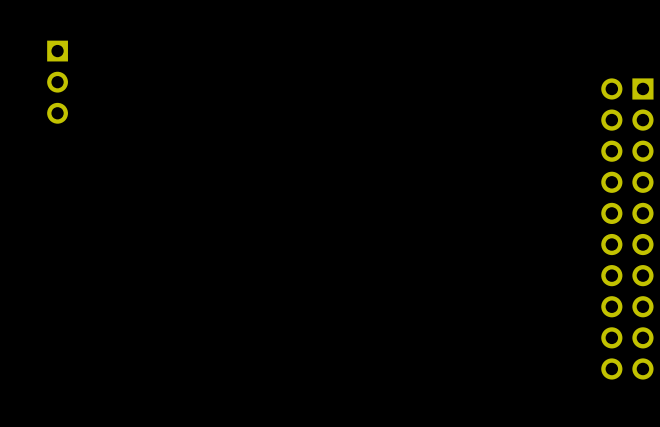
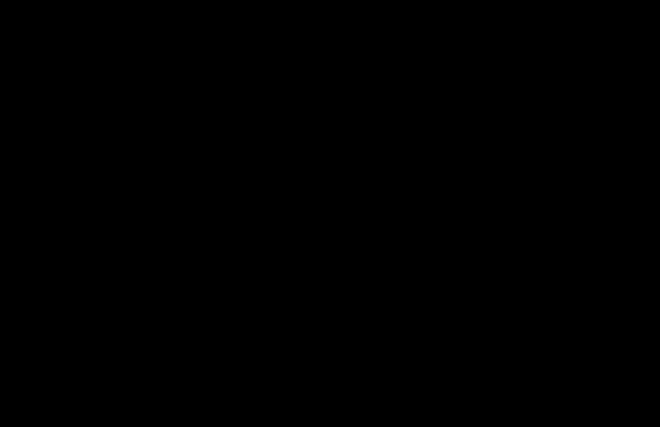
part: (57, 82) -> none
part: (627, 228) -> none

